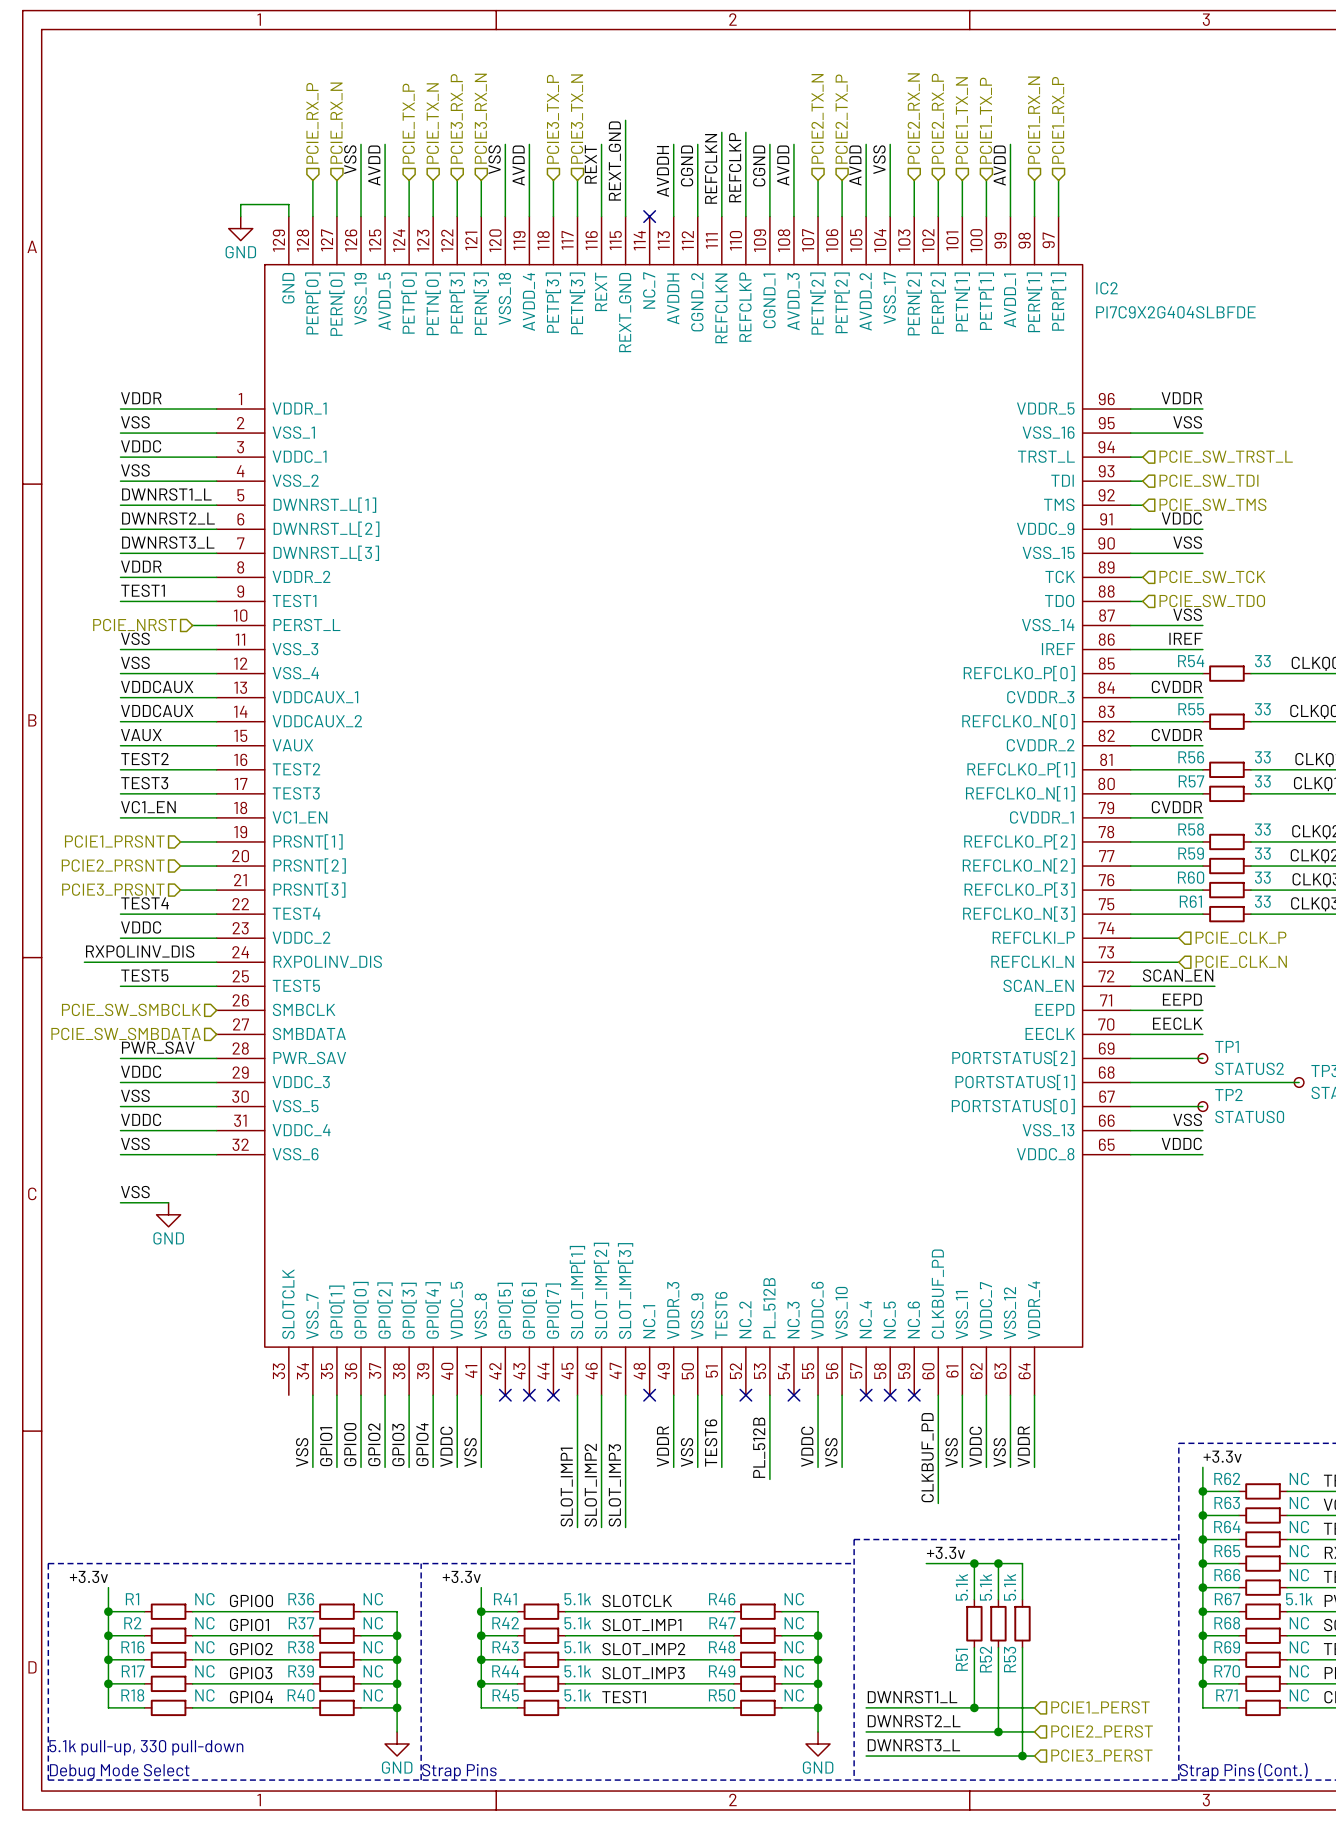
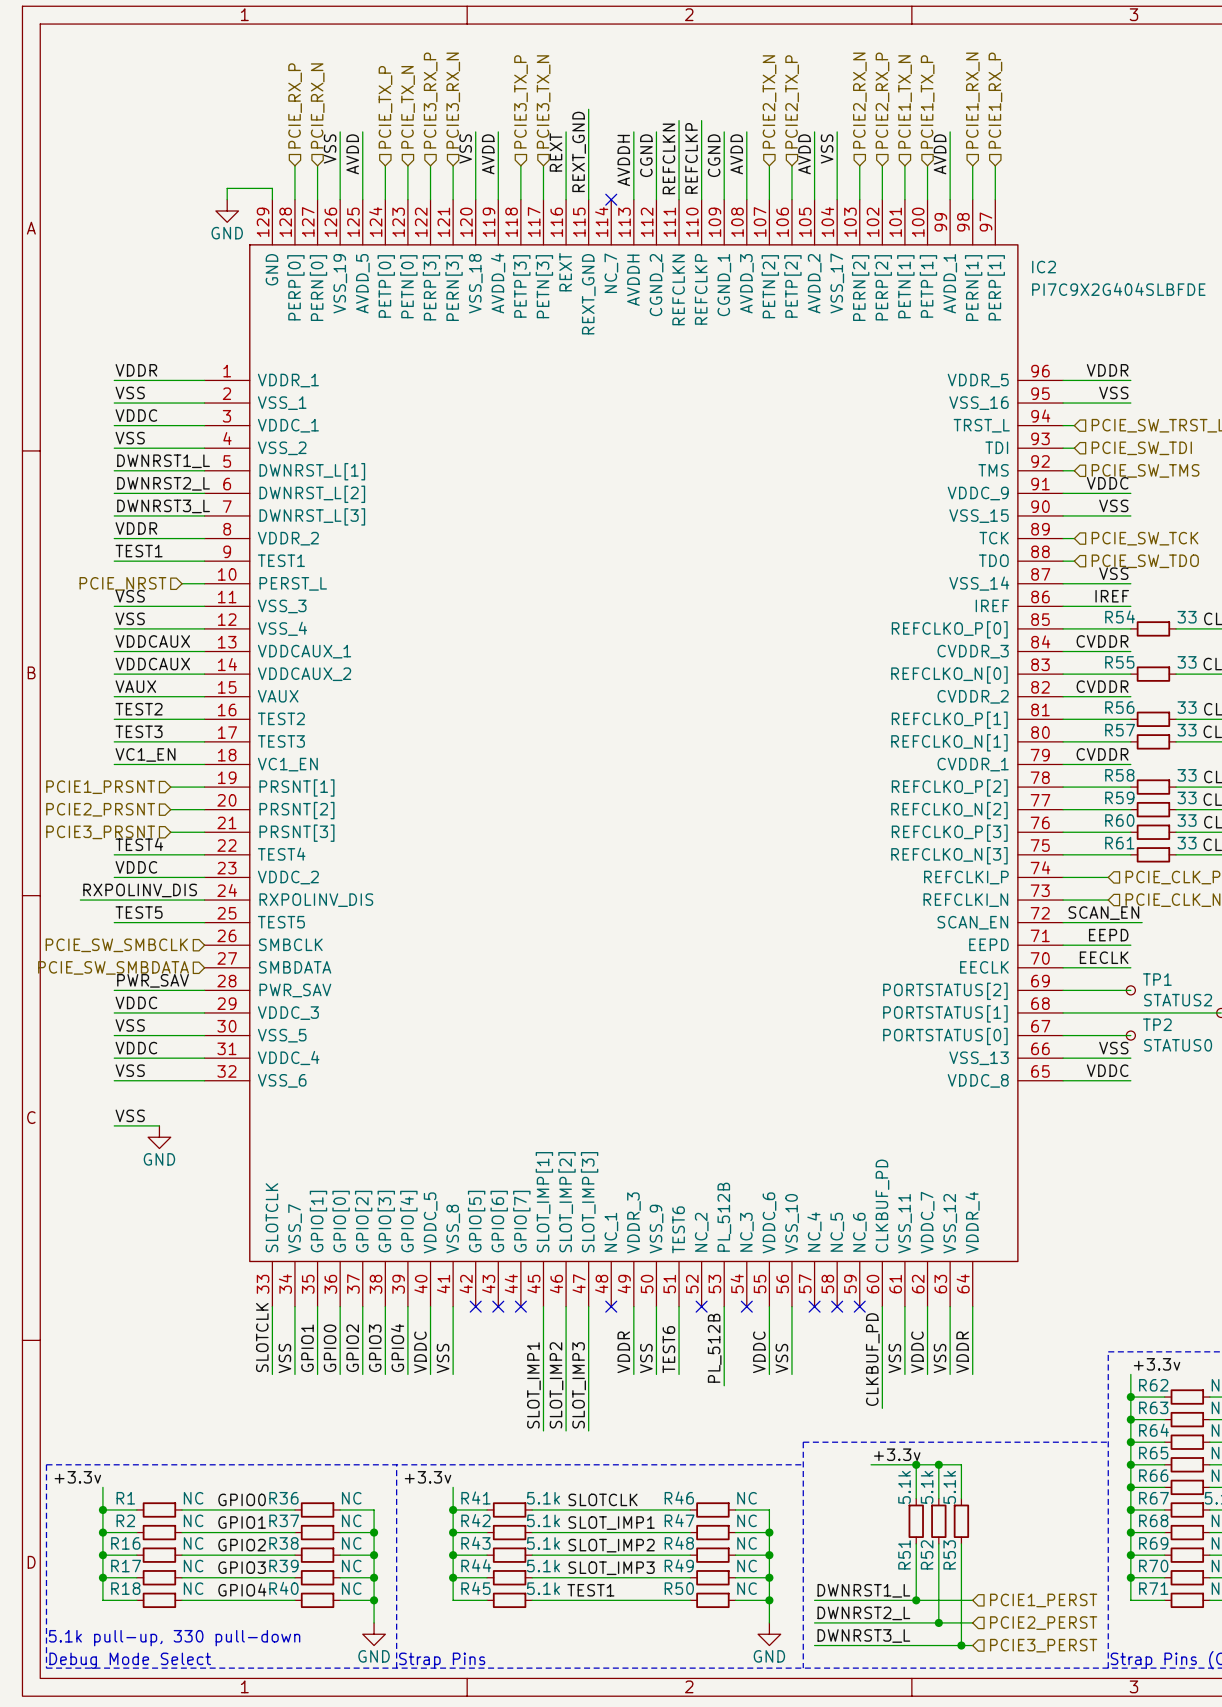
wire: none -> (272, 1306) (272, 1374)
label: none -> SLOTCLK (262, 1337)

